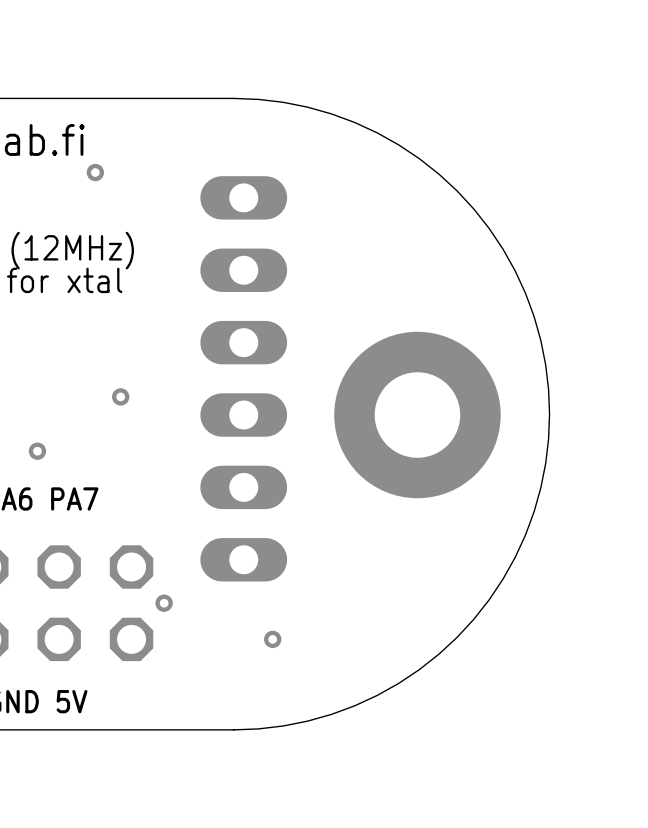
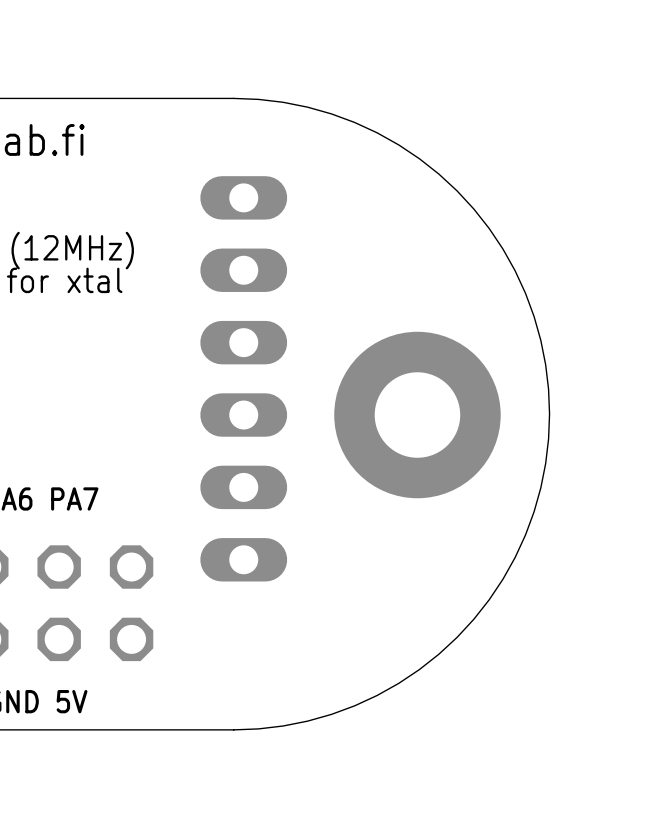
via: (95, 172) -> none
via: (120, 396) -> none
via: (37, 451) -> none
via: (164, 603) -> none
via: (272, 639) -> none

